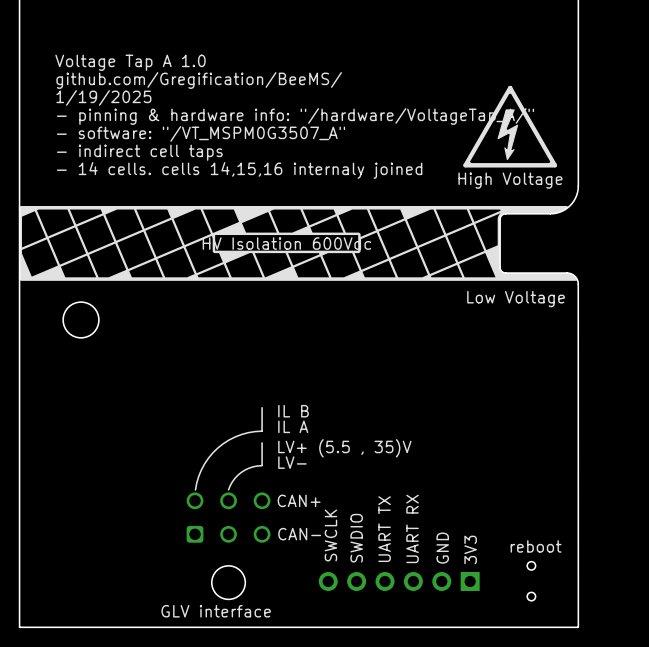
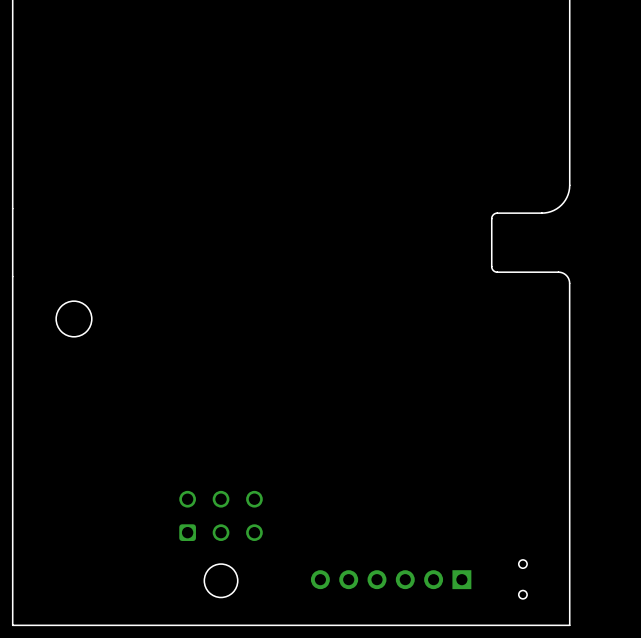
text: Voltage Tap A 1.0 (130, 62) -> none
text: github.com/Gregification/BeeMS/ (199, 80) -> none
drawing: [463, 85, 558, 168] -> none
text: 1/19/2025 (103, 97) -> none
text: - pinning & hardware info: "/hardware/VoltageTap_A/" (295, 116) -> none
text: - software: "/VT_MSPM0G3507_A" (201, 133) -> none
text: - indirect cell taps (139, 152) -> none
text: - 14 cells. cells 14,15,16 internaly joined (239, 170) -> none
text: High Voltage (510, 180) -> none
drawing: [19, 205, 578, 281] -> none
text: HV Isolation 600Vdc (286, 243) -> none
text: Low Voltage (516, 299) -> none
line: (262, 407) (262, 431) (241, 434) (217, 448) (204, 463) (195, 489) -> none
text: IL B (293, 411) -> none
text: IL A (293, 426) -> none
line: (262, 442) (262, 465) -> none
text: LV+ (5.5 , 35)V (344, 448) -> none
text: LV- (292, 462) -> none
line: (262, 465) (249, 468) (241, 472) (234, 478) (228, 489) -> none
text: CAN+ (299, 500) -> none
text: UART RX (412, 528) -> none
text: UART TX (384, 529) -> none
text: CAN- (299, 534) -> none
text: SWCLK (330, 535) -> none
text: SWDIO (356, 538) -> none
text: reboot (536, 546) -> none
text: GND (442, 548) -> none
text: 3V3 (470, 549) -> none
text: GLV interface (216, 611) -> none

